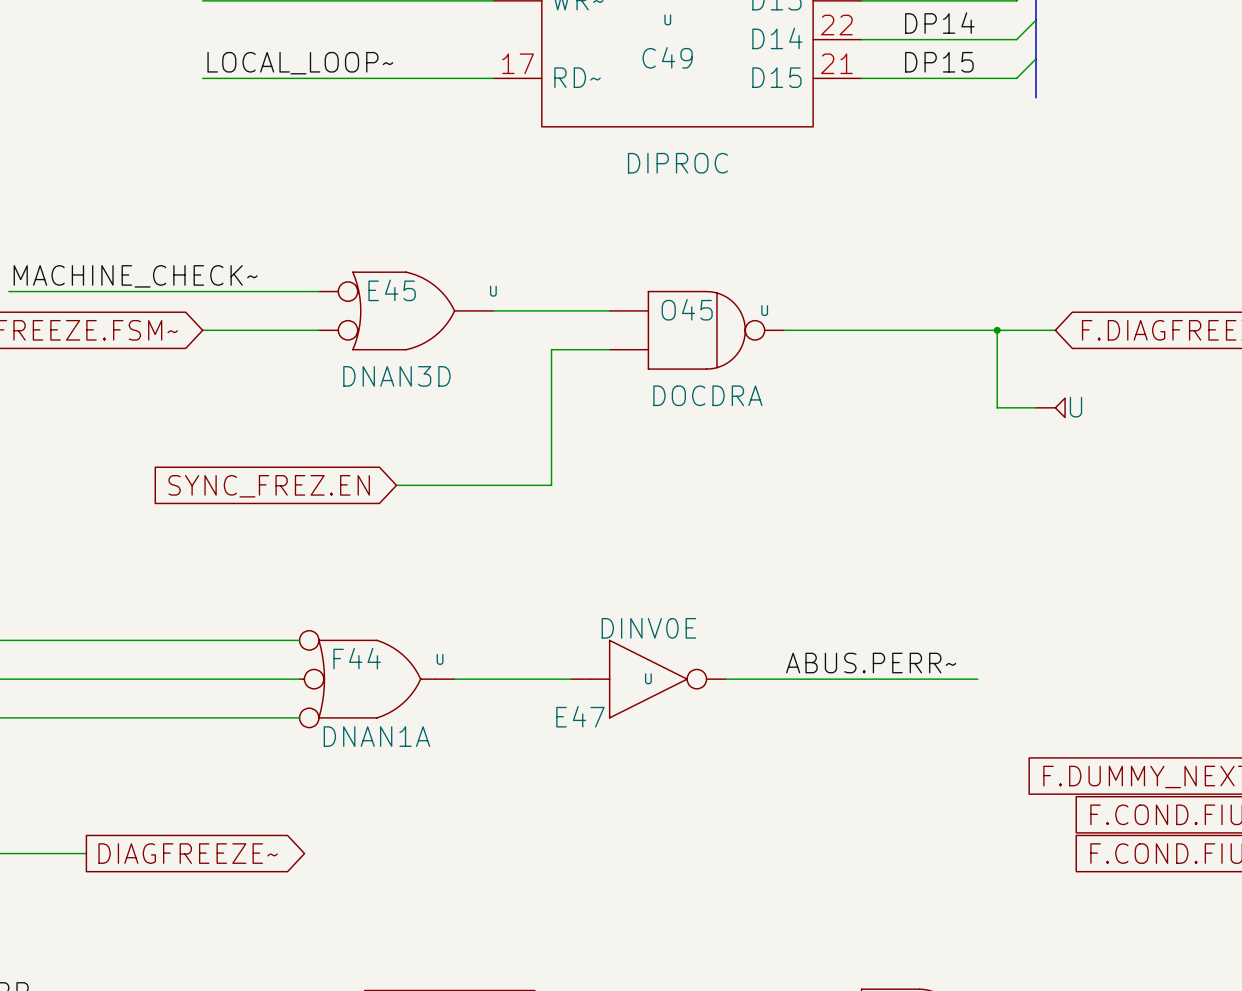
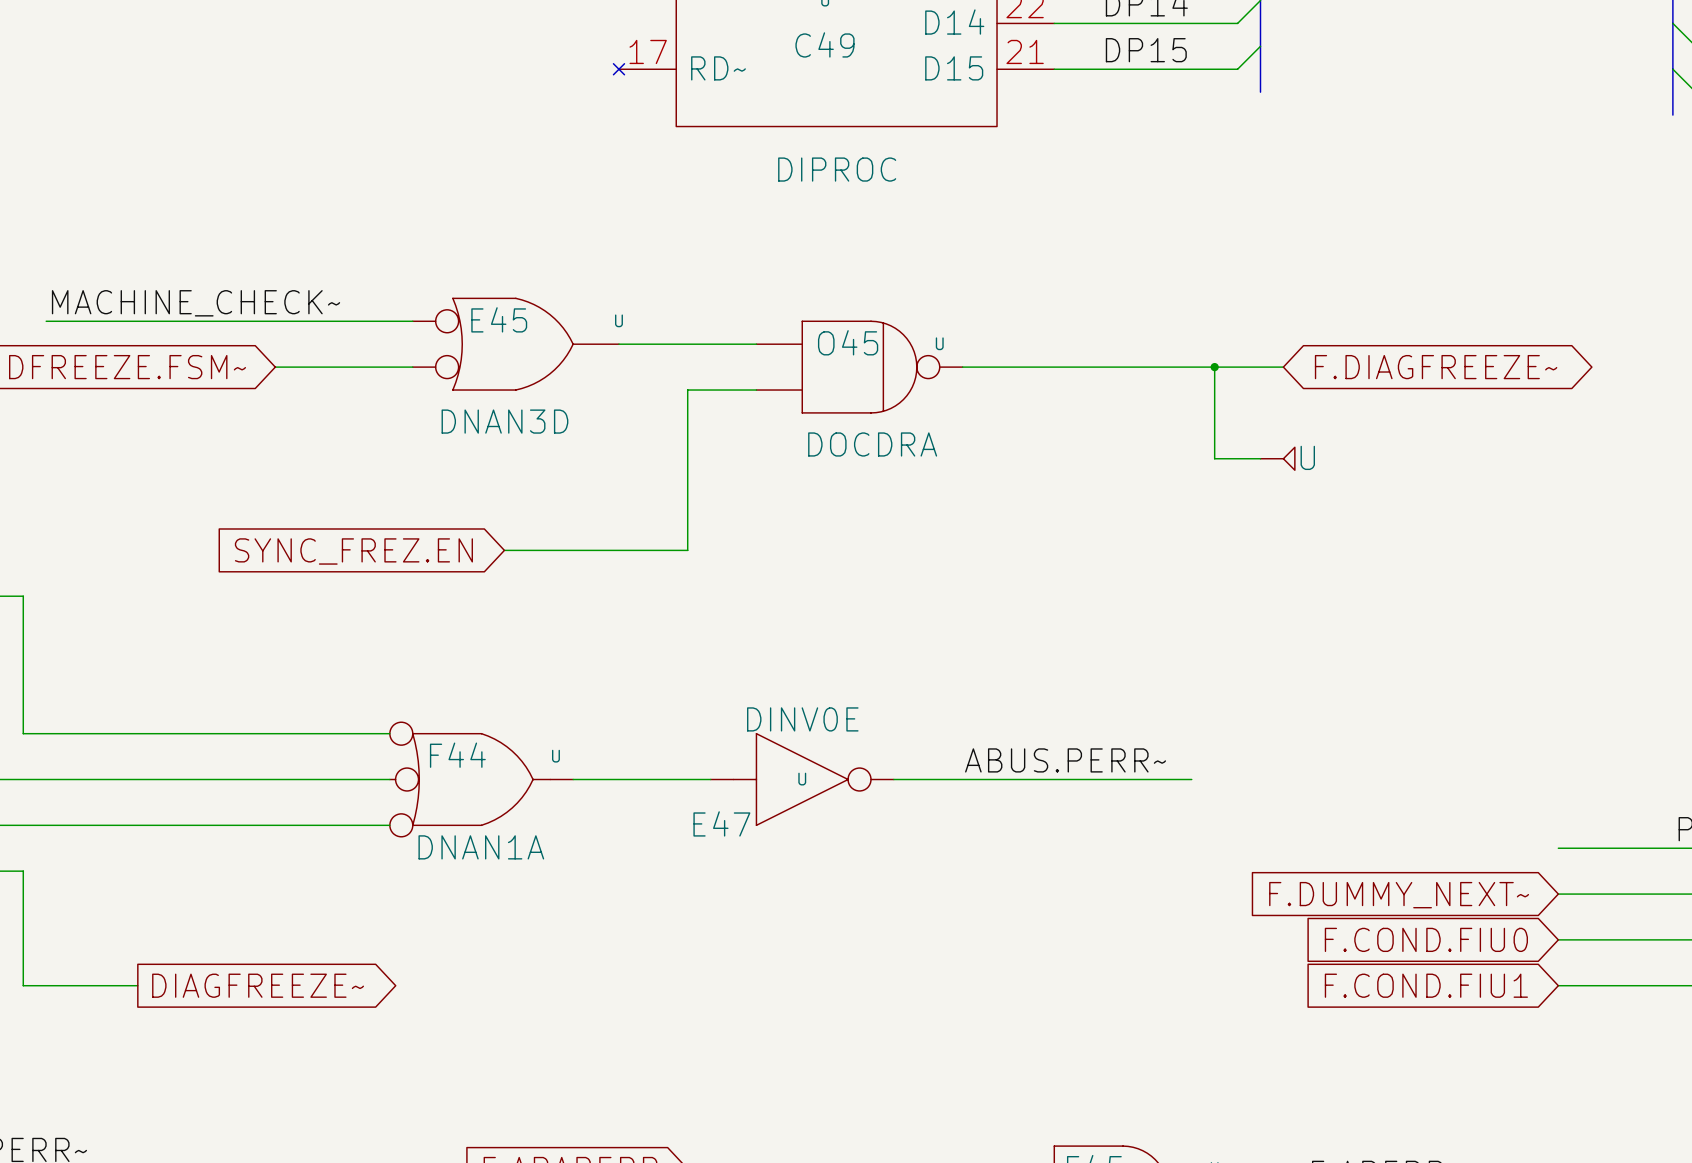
label: LOCAL_LOOP~ (300, 63) -> none
wire: (202, 78) (493, 78) -> none
no-connect mark: none -> (618, 69)

